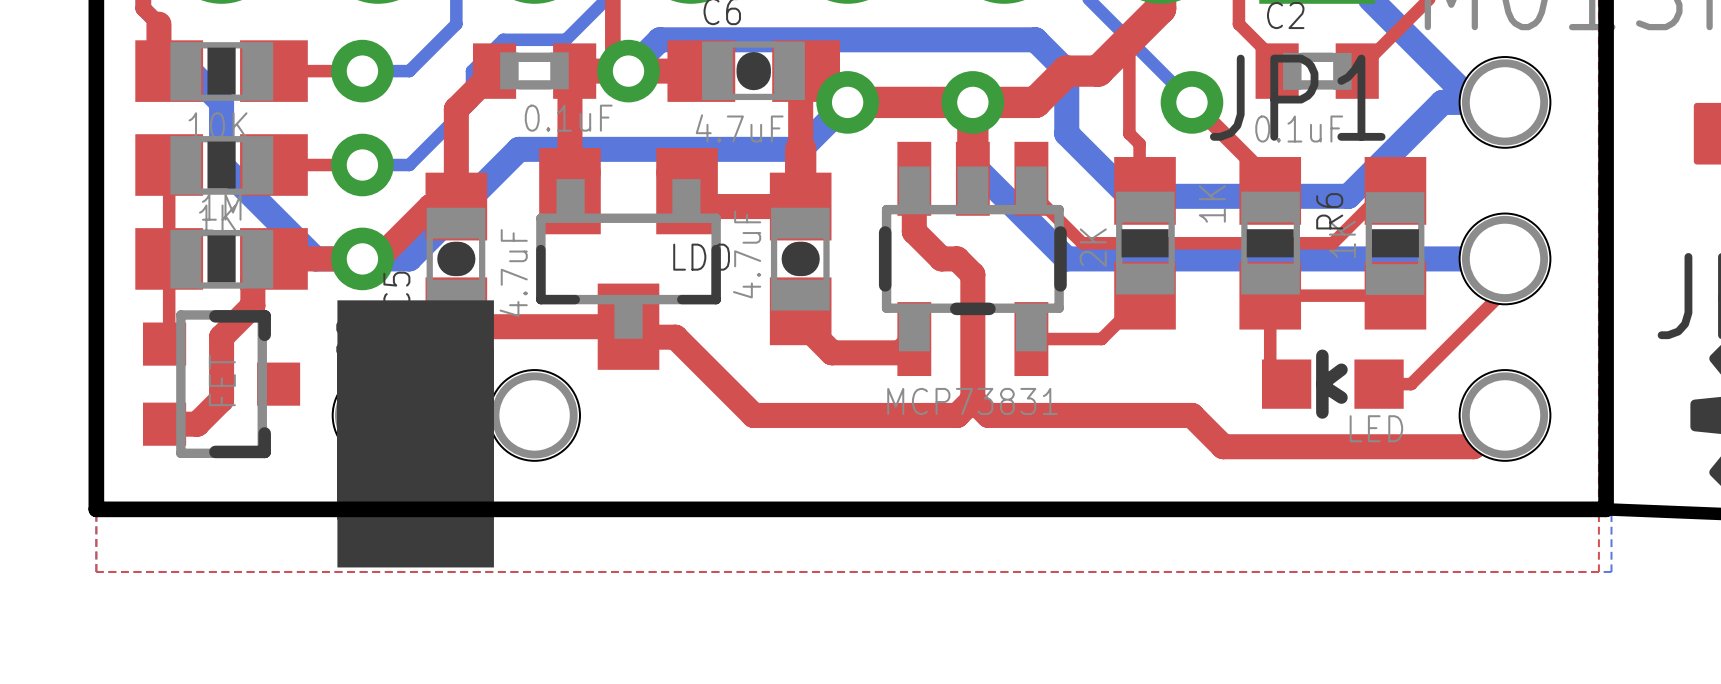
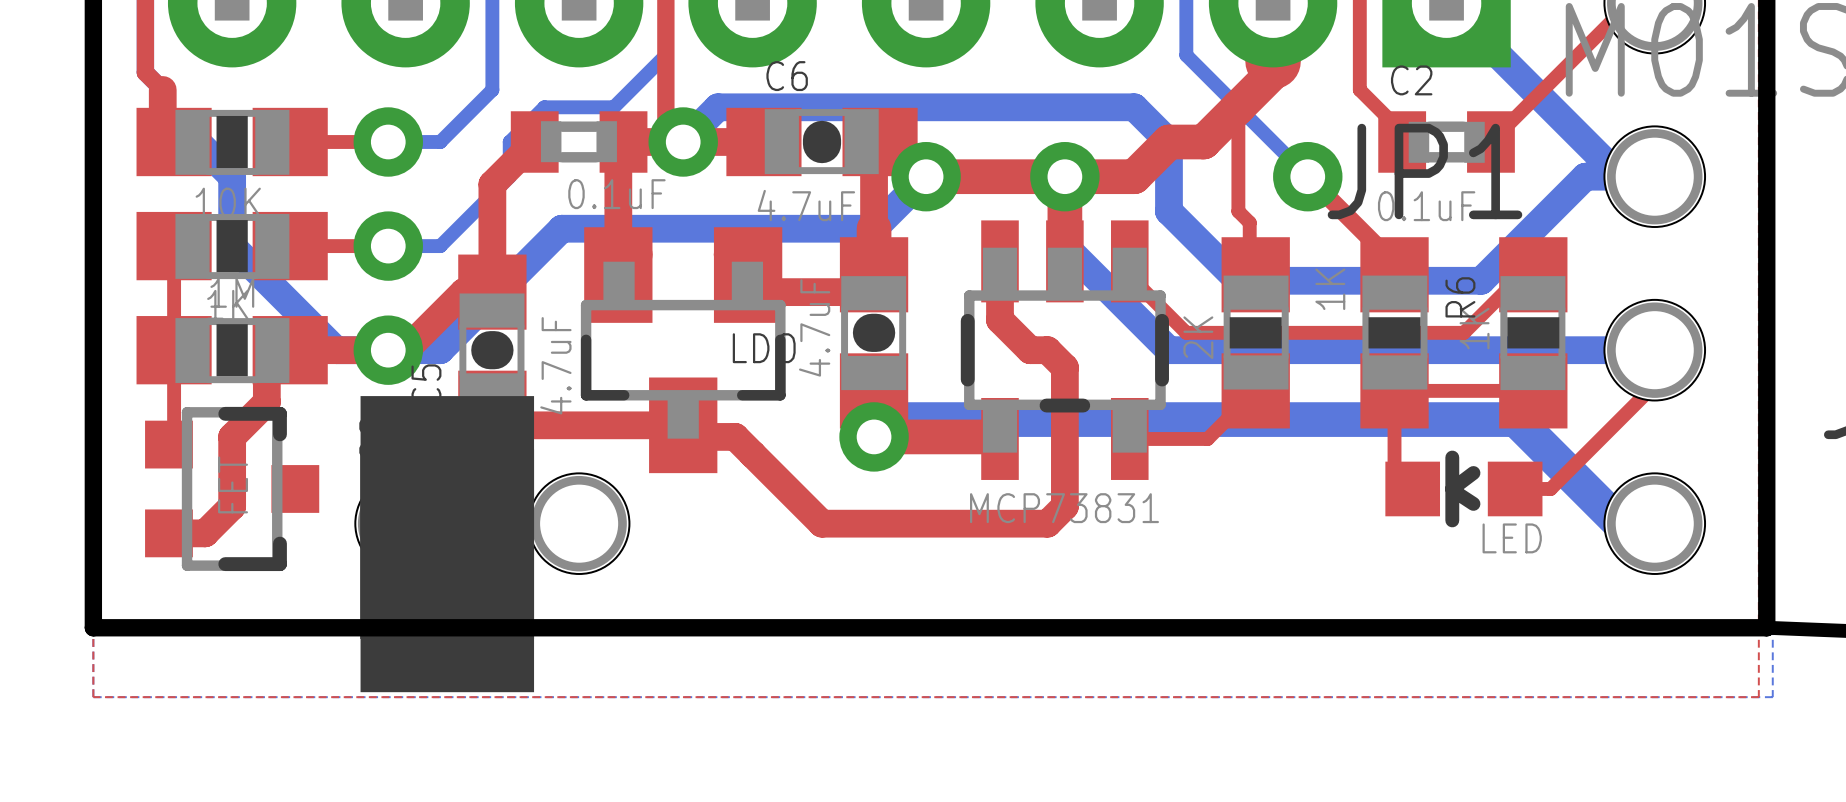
part position: (800, 258) -> (874, 332)
top track: (800, 321) (831, 352) (900, 352) (914, 339) -> (874, 419) (874, 436) (997, 436) (1000, 438)
bottom track: none -> (874, 436) (891, 419) (1515, 419) (1620, 523) (1654, 523)
via: none -> (874, 436)
top track: (972, 399) (988, 415) (1191, 415) (1223, 446) (1473, 446) (1505, 415) -> none

